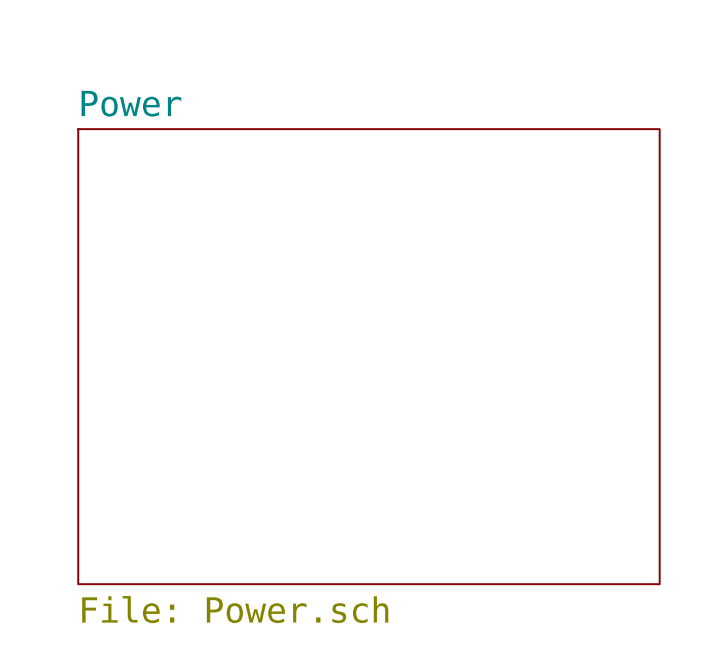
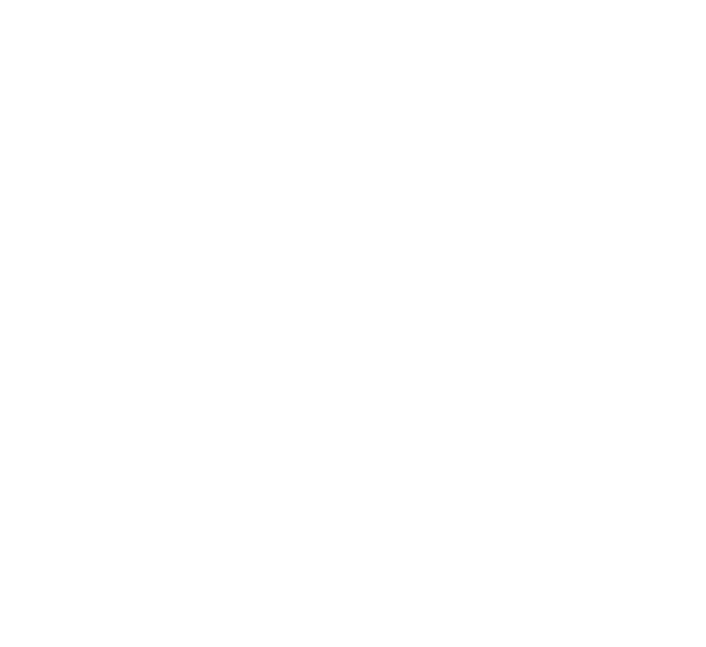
sheet Power: File: Power.sch (368, 356) -> none

